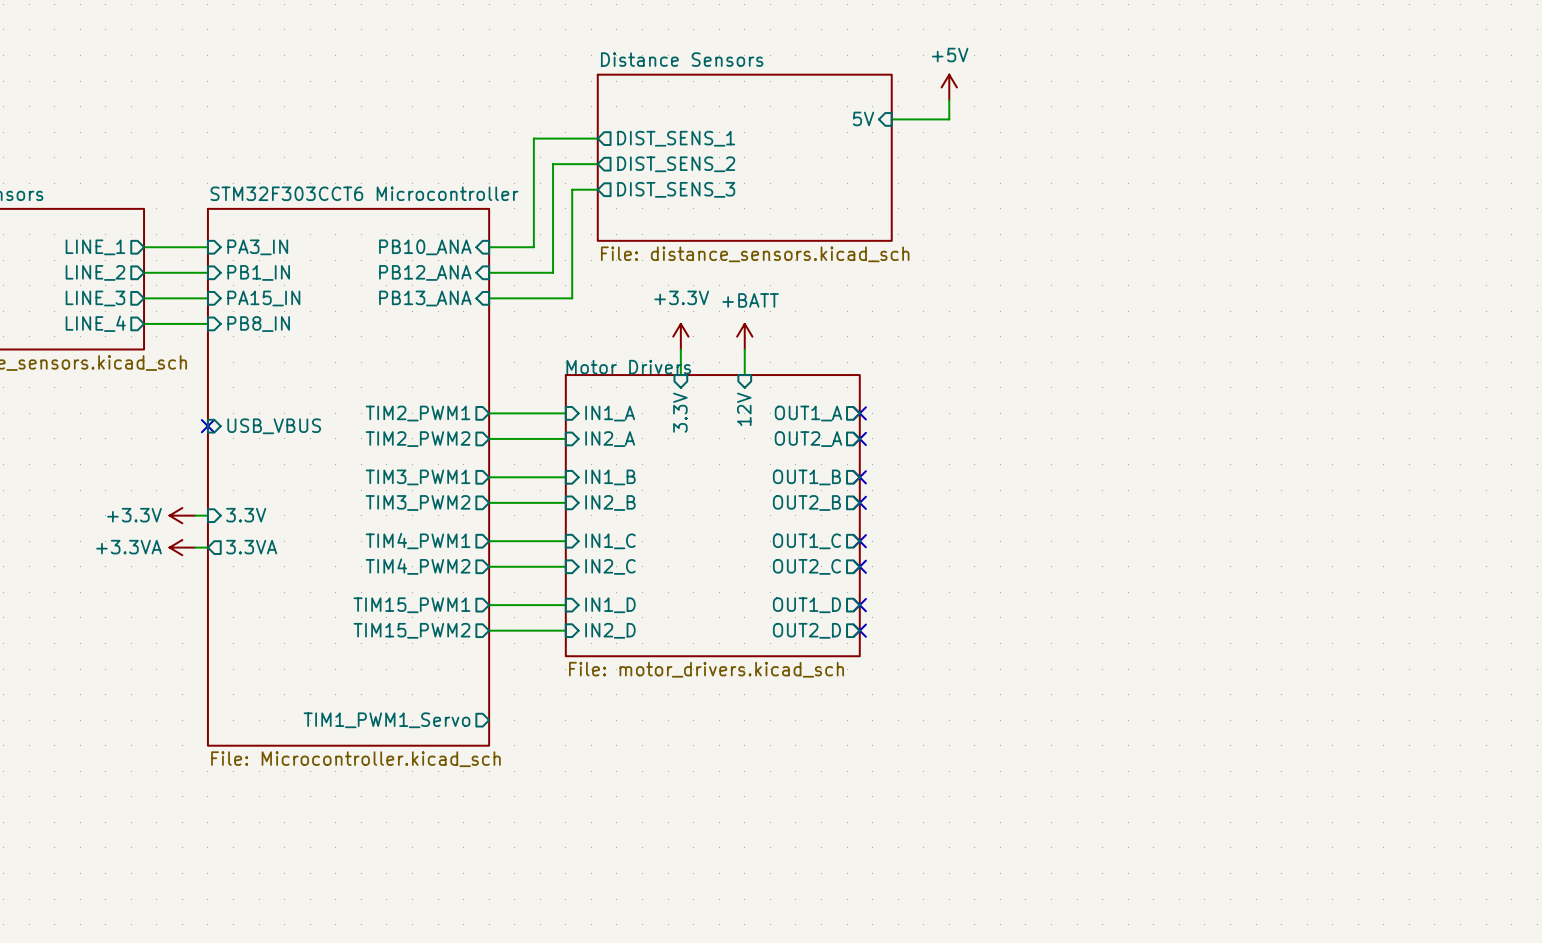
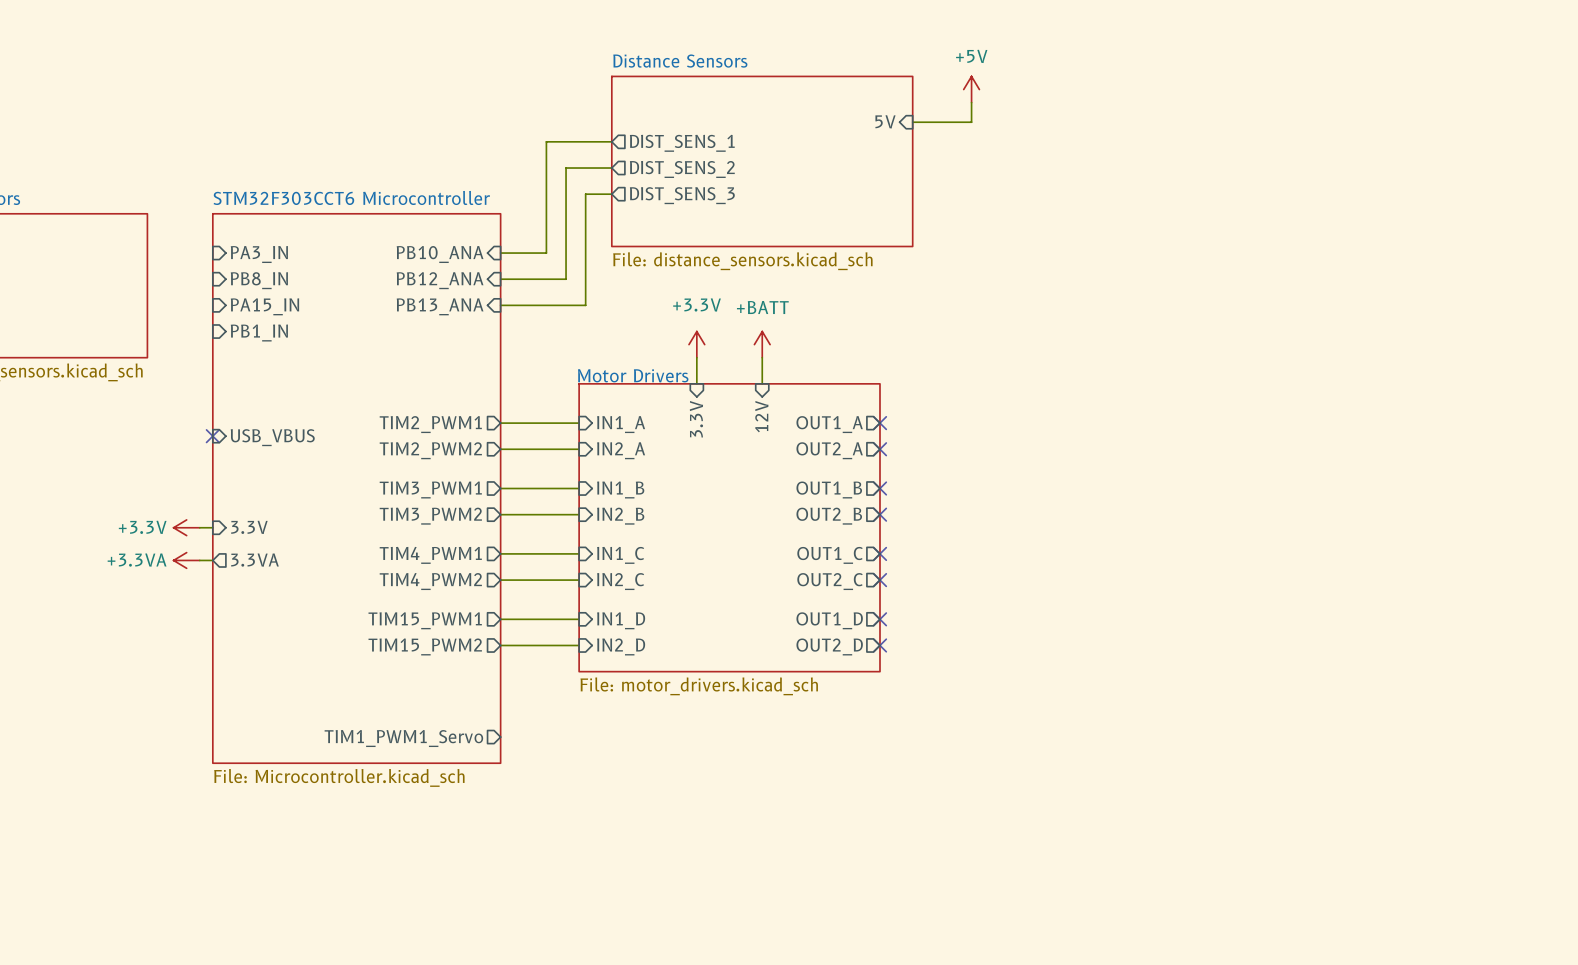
sheet pin: LINE_1 (95, 247) -> none
wire: (144, 247) (207, 247) -> none
sheet pin: LINE_2 (95, 272) -> none
wire: (144, 272) (207, 272) -> none
sheet pin: PB1_IN (258, 272) -> PB8_IN (259, 280)
sheet pin: LINE_3 (95, 298) -> none
wire: (144, 298) (207, 298) -> none
sheet pin: LINE_4 (95, 323) -> none
wire: (144, 323) (207, 323) -> none
sheet pin: PB8_IN (258, 324) -> PB1_IN (259, 333)

